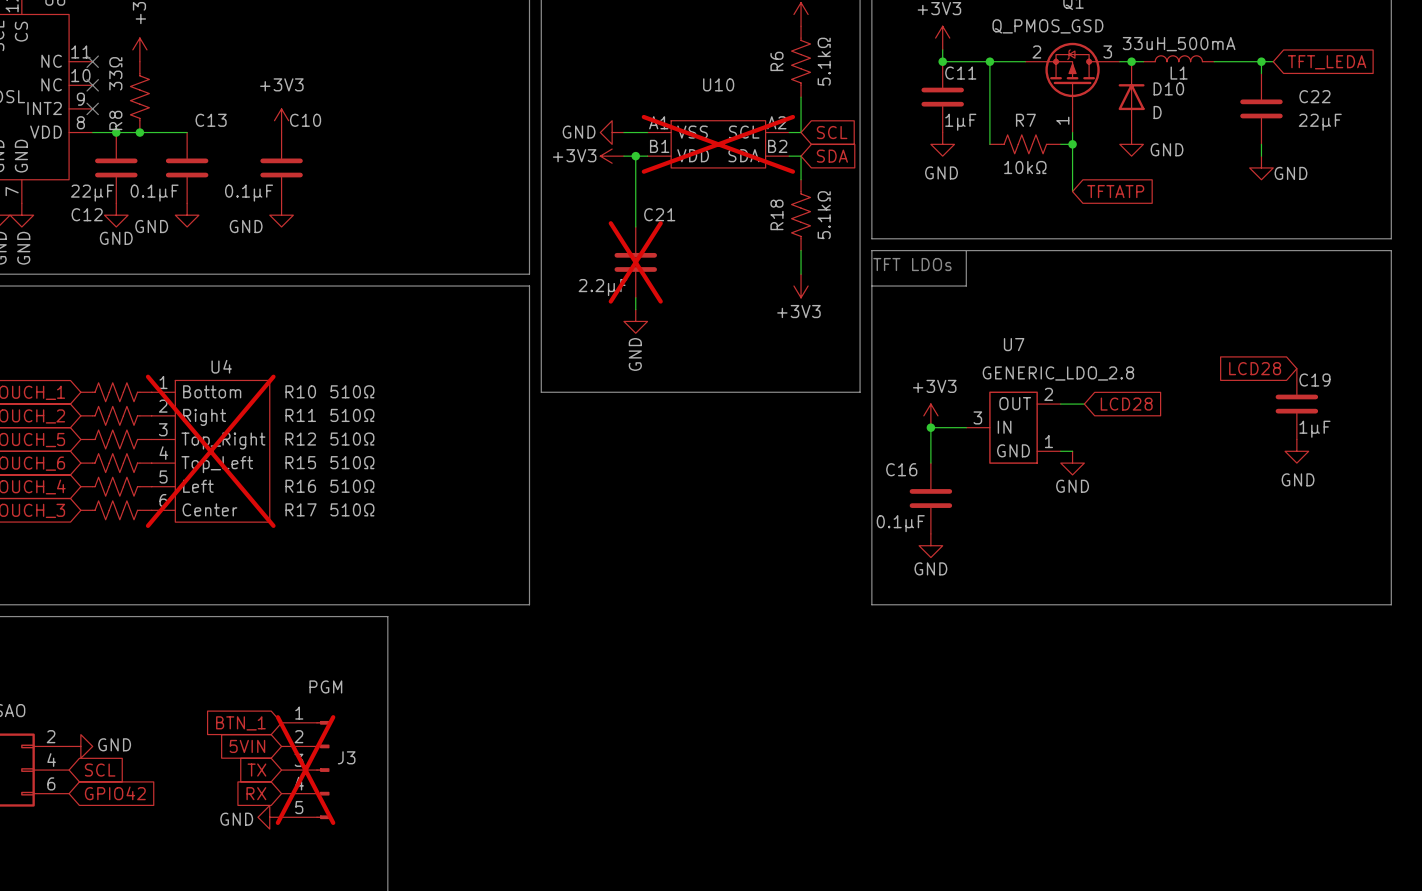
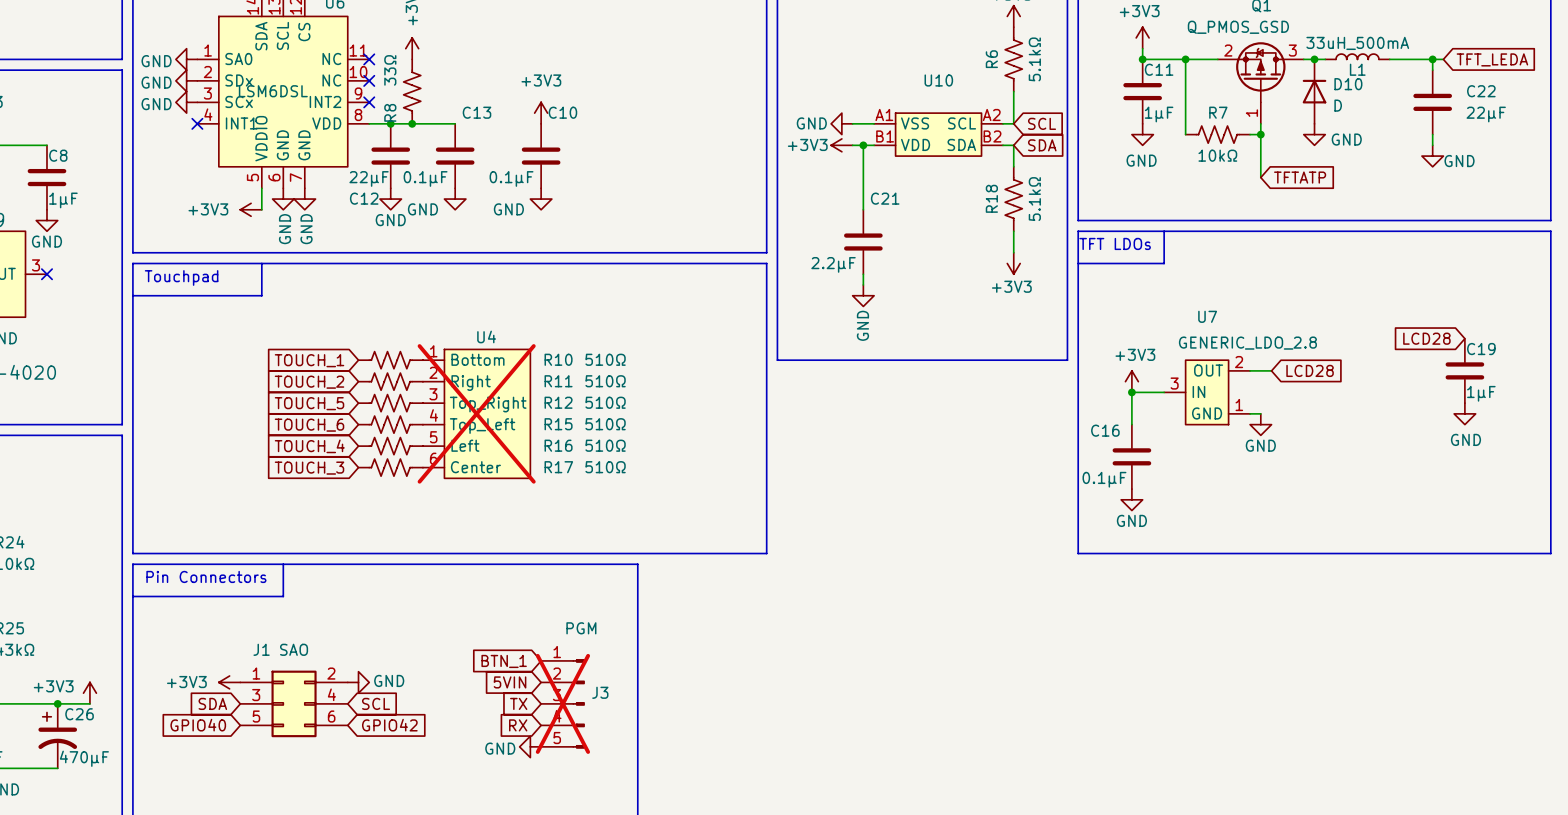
U10 do-not-place cross: (718, 144) -> none
C21 do-not-place cross: (635, 262) -> none

